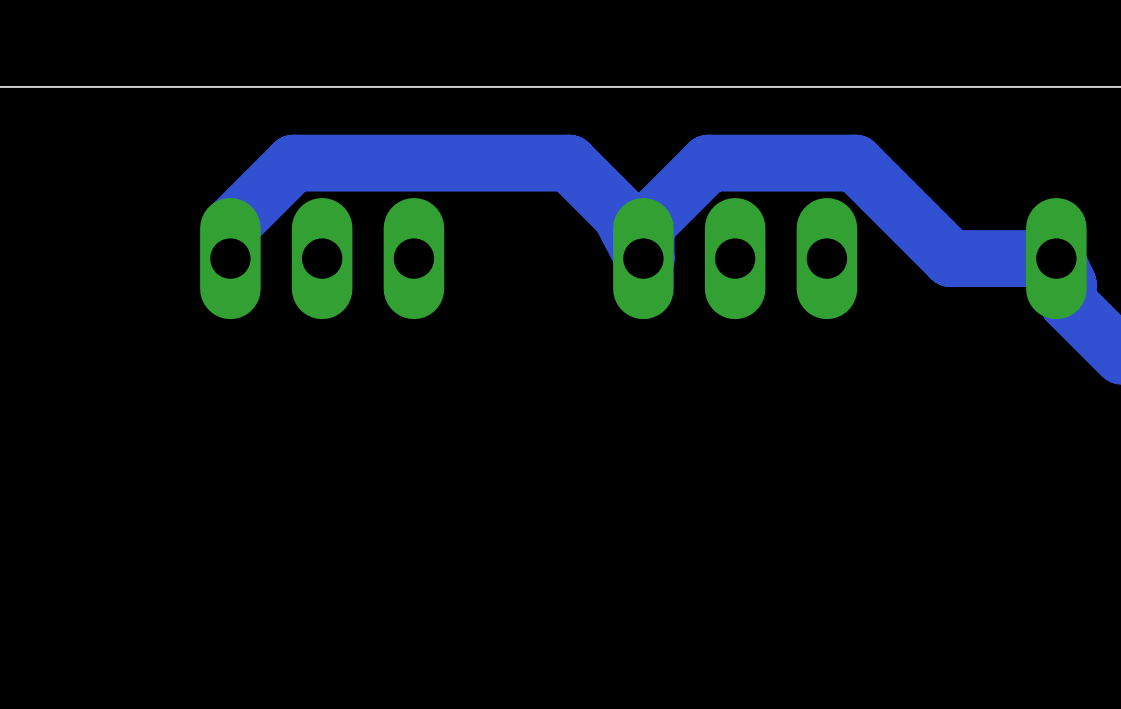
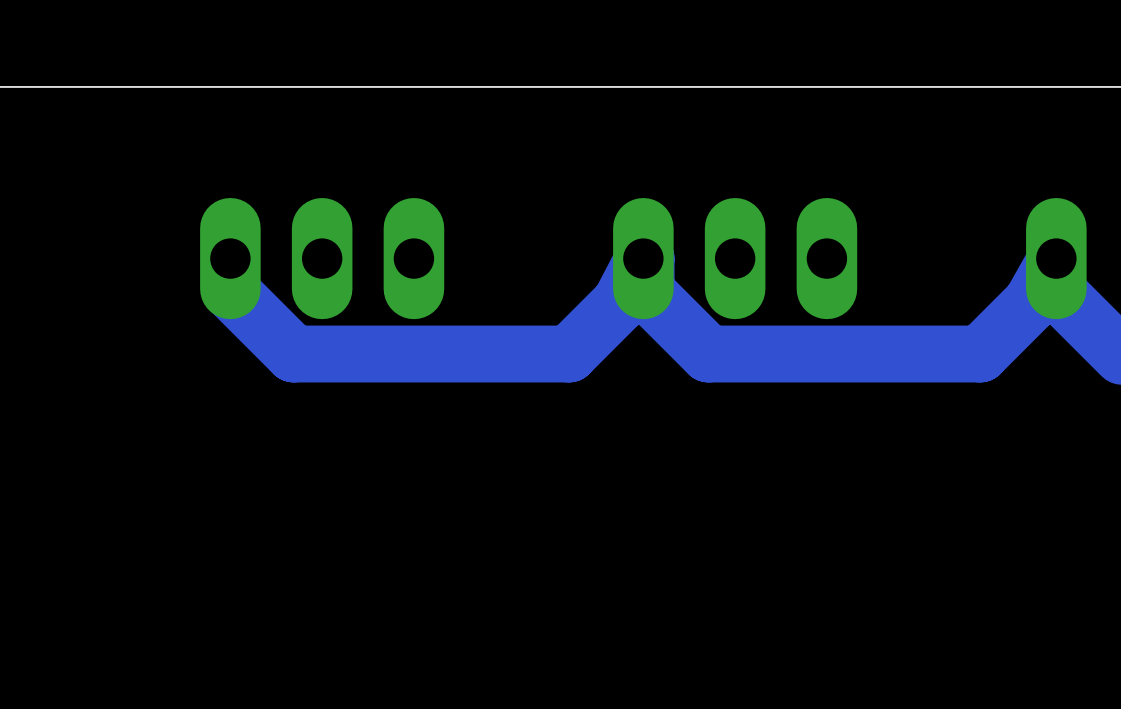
track: (643, 258) (620, 214) (569, 163) (293, 163) (231, 225) (231, 258) -> (643, 258) (620, 302) (569, 354) (293, 354) (231, 291) (231, 258)
track: (646, 258) (646, 225) (708, 163) (855, 163) (950, 258) (1056, 258) (1068, 284) (1068, 302) -> (646, 258) (646, 291) (708, 354) (980, 354) (1031, 302) (1056, 258) (1057, 291) (1068, 302)

